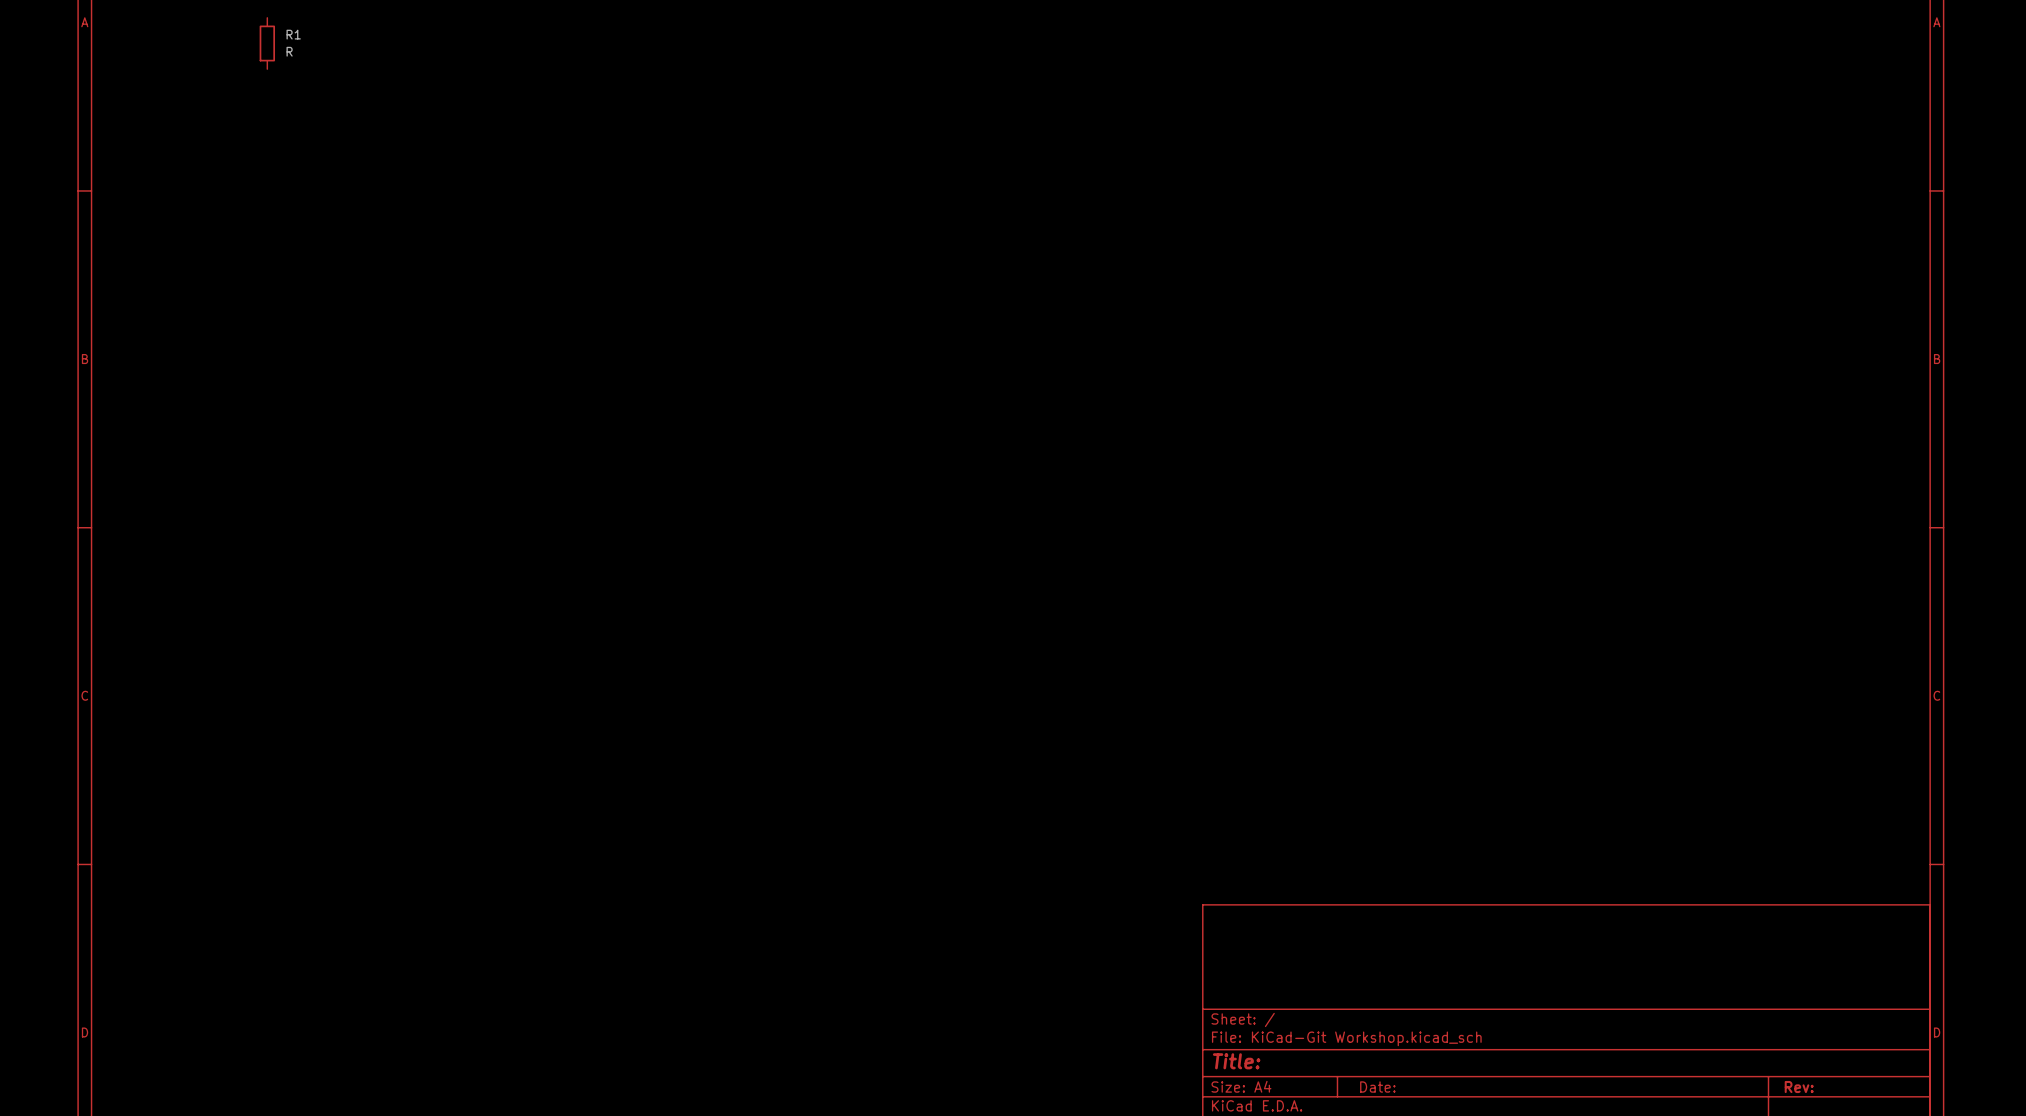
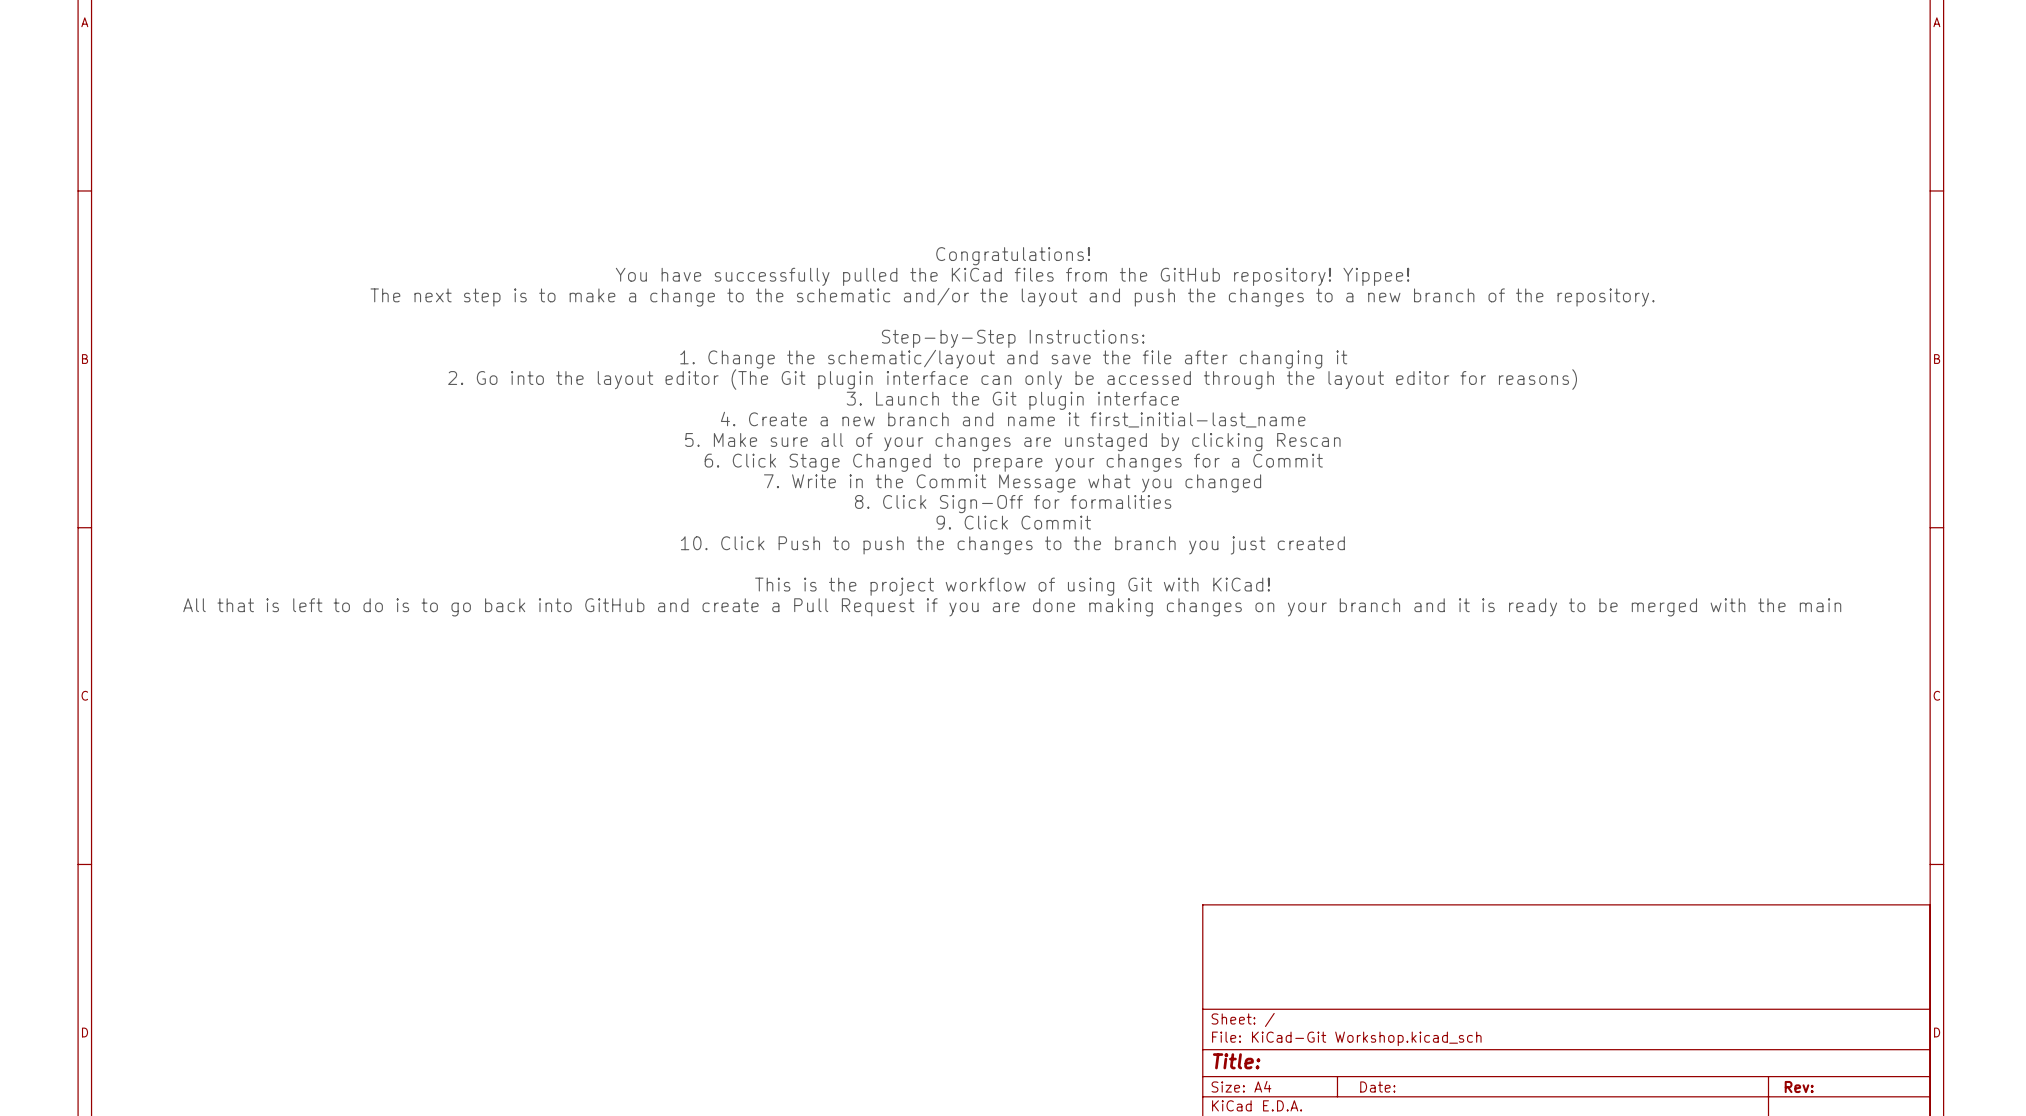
R1: R (267, 43) -> none
text: none -> Congratulations! (1013, 256)
text: none -> You have successfully pulled the KiCad files from the GitHub repository! Yippee! (1012, 276)
text: none -> The next step is to make a change to the schematic and/or the layout and push the changes to a new branch of the repository. (1012, 297)
text: none -> Step-by-Step Instructions: (1013, 338)
text: none -> 1. Change the schematic/layout and save the file after changing it (1013, 359)
text: none -> 2. Go into the layout editor (The Git plugin interface can only be accessed through the layout editor for reasons) (1012, 379)
text: none -> 3. Launch the Git plugin interface (1012, 400)
text: none -> 4. Create a new branch and name it first_initial-last_name (1013, 419)
text: none -> 5. Make sure all of your changes are unstaged by clicking Rescan (1012, 442)
text: none -> 6. Click Stage Changed to prepare your changes for a Commit (1013, 462)
text: none -> 7. Write in the Commit Message what you changed (1012, 483)
text: none -> 8. Click Sign-Off for formalities (1013, 504)
text: none -> 9. Click Commit (1013, 522)
text: none -> 10. Click Push to push the changes to the branch you just created (1012, 545)
text: none -> This is the project workflow of using Git with KiCad! (1012, 586)
text: none -> All that is left to do is to go back into GitHub and create a Pull Request if you are done making changes on your branch and it is ready to be merged with the main (1012, 607)

